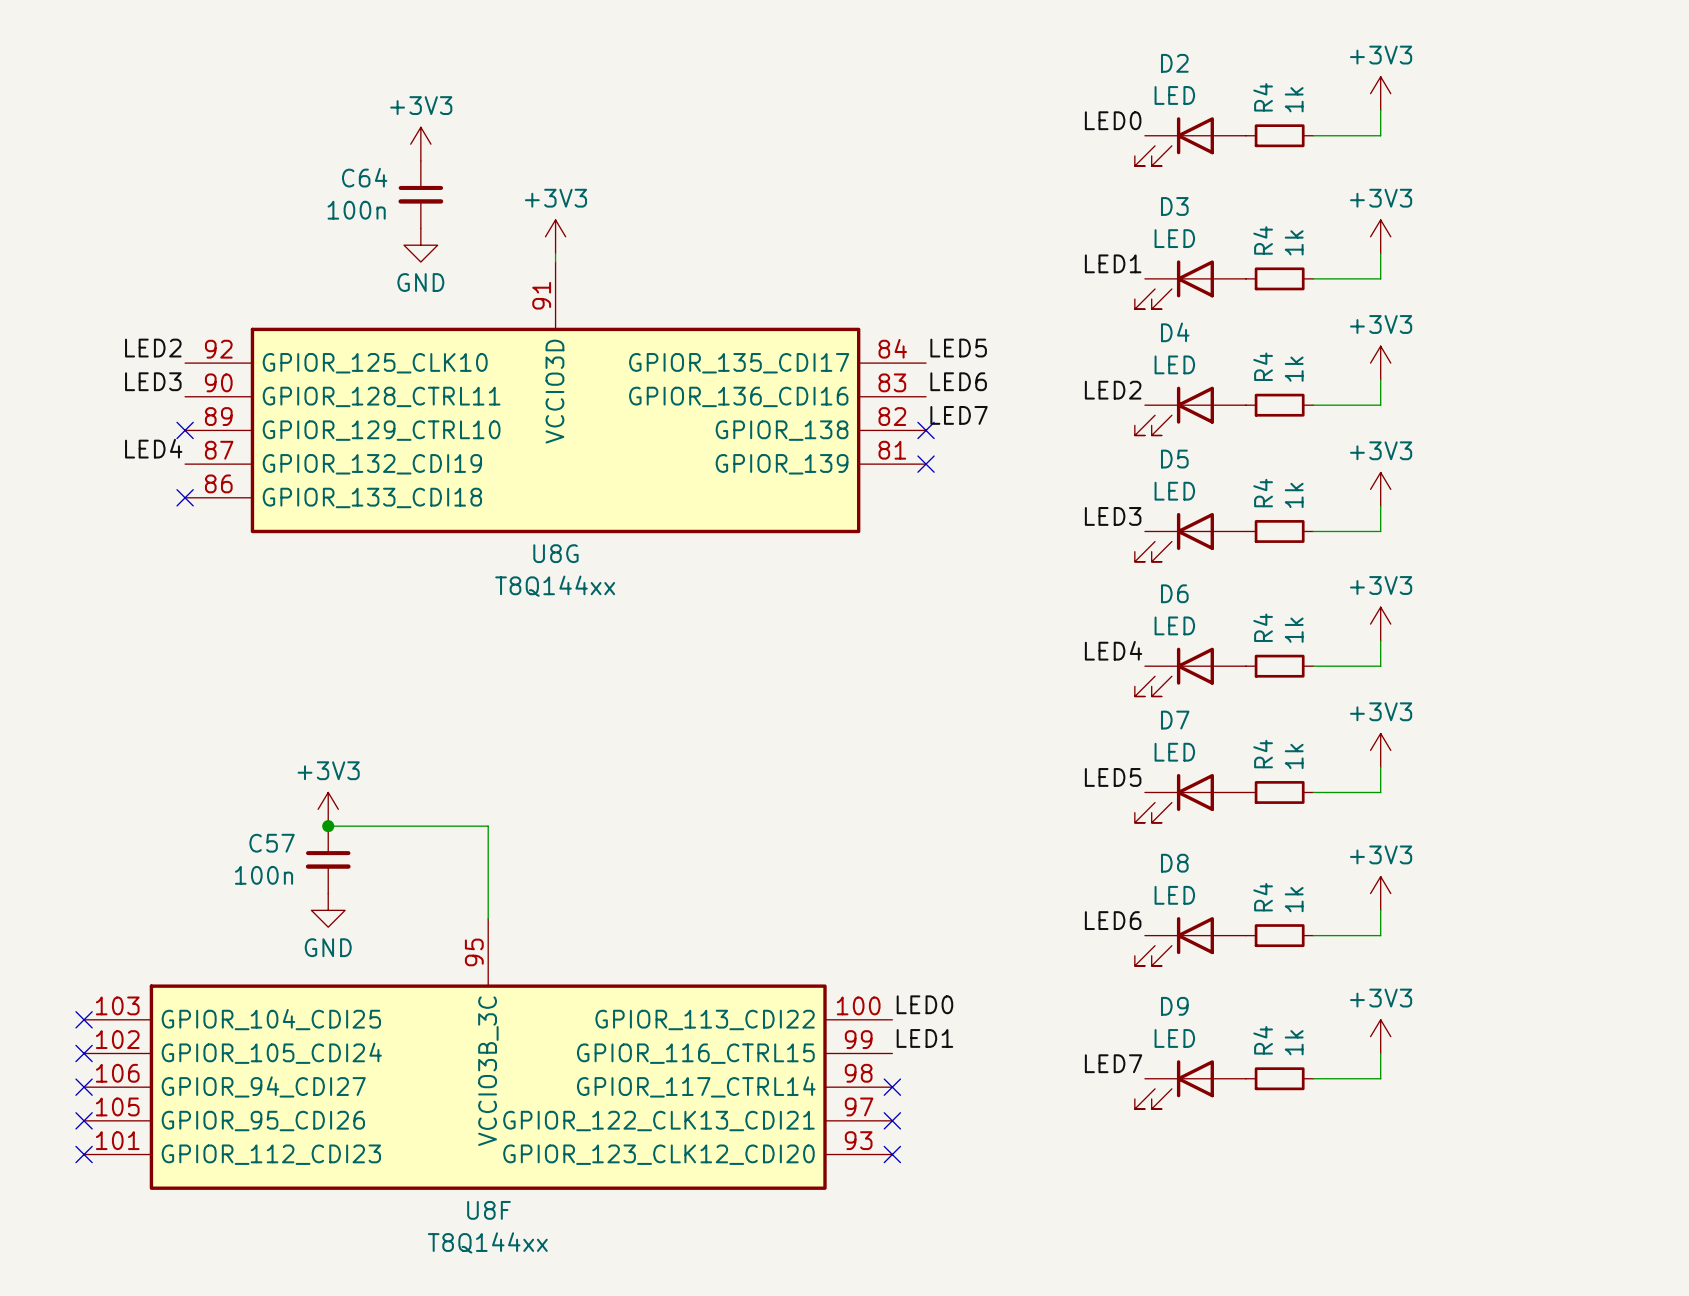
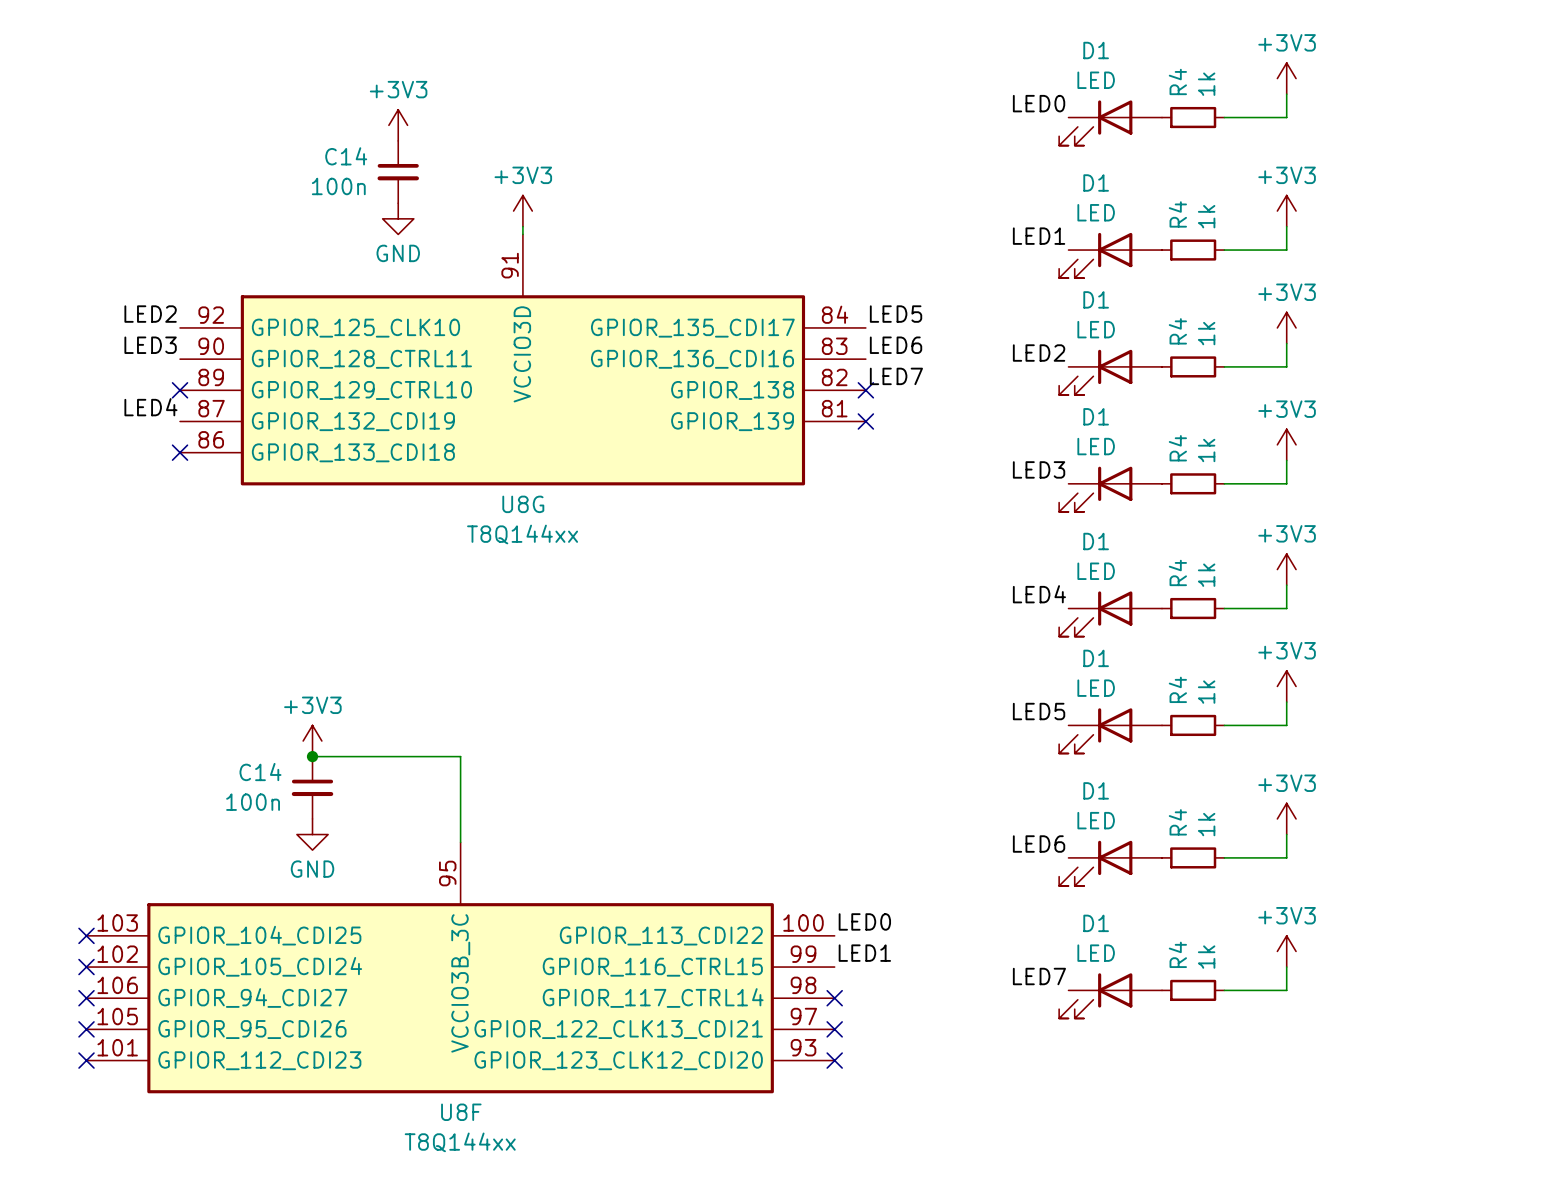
D2 name: D2 (1174, 63) -> D1 (1096, 50)
C64 name: C64 (364, 177) -> C14 (346, 156)
D3 name: D3 (1174, 206) -> D1 (1096, 182)
D4 name: D4 (1175, 332) -> D1 (1096, 299)
D5 name: D5 (1174, 459) -> D1 (1096, 416)
D6 name: D6 (1174, 593) -> D1 (1096, 541)
D7 name: D7 (1175, 720) -> D1 (1096, 658)
C57 name: C57 (272, 843) -> C14 (260, 772)
D8 name: D8 (1174, 863) -> D1 (1096, 790)
D9 name: D9 (1174, 1006) -> D1 (1096, 923)

